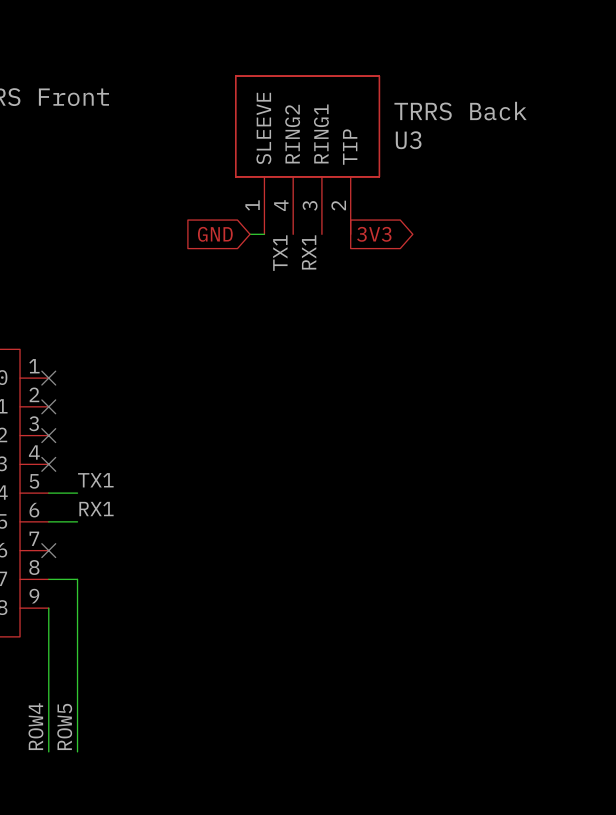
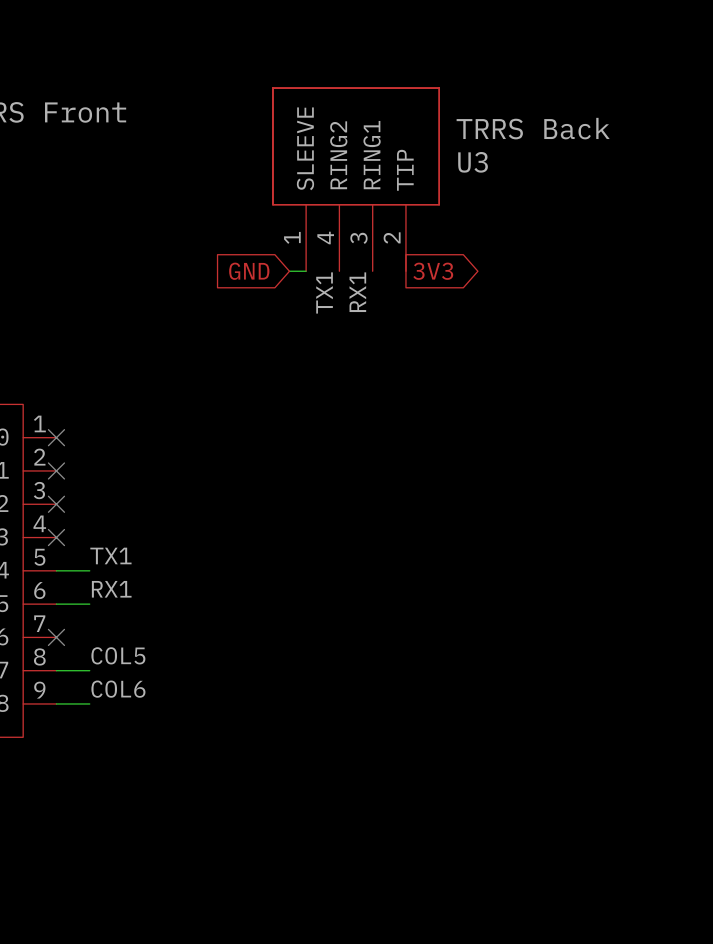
label: none -> COL5 (118, 655)
wire: (77, 579) (77, 751) -> none
label: none -> COL6 (118, 689)
wire: (48, 608) (48, 751) -> (56, 703) (89, 703)
label: ROW4 (35, 726) -> none
label: ROW5 (64, 726) -> none

